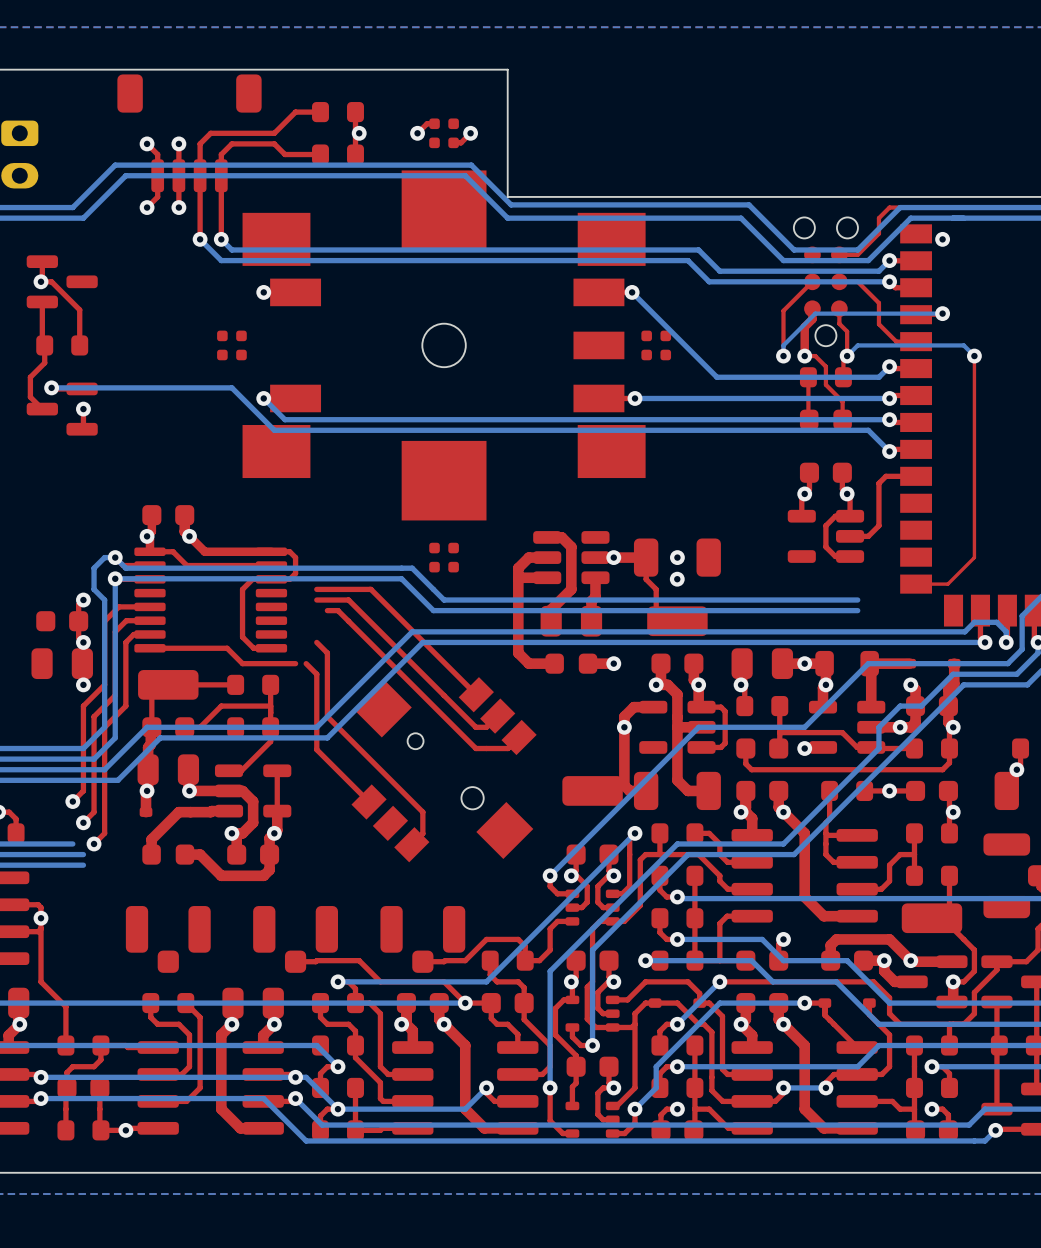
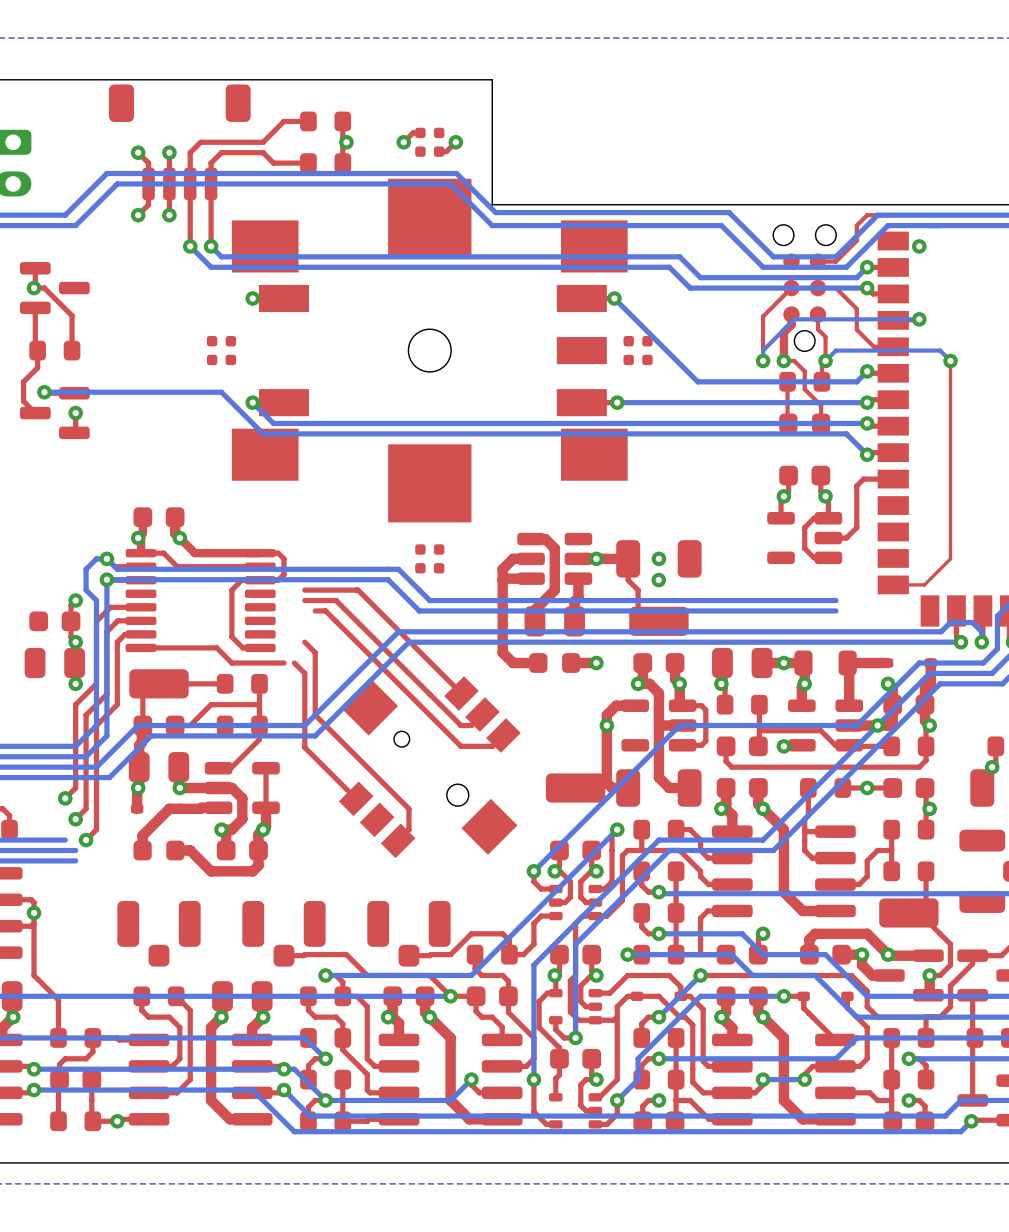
bottom track: (942, 663) (868, 663) (804, 727) -> (856, 725) (783, 725)
bottom track: (921, 706) (900, 706) -> (919, 663) (877, 704)
bottom track: (878, 727) (878, 748) -> (898, 704) (856, 746)

